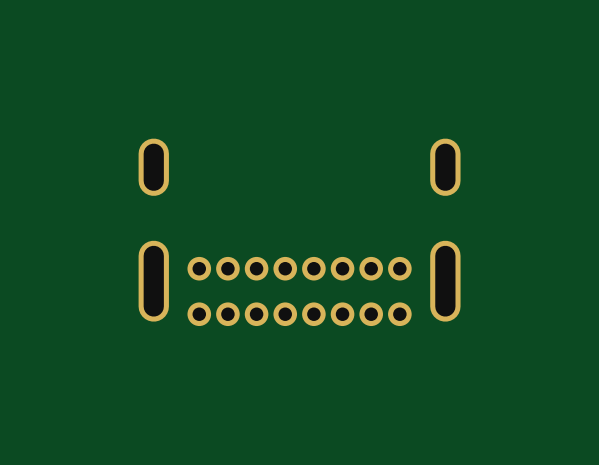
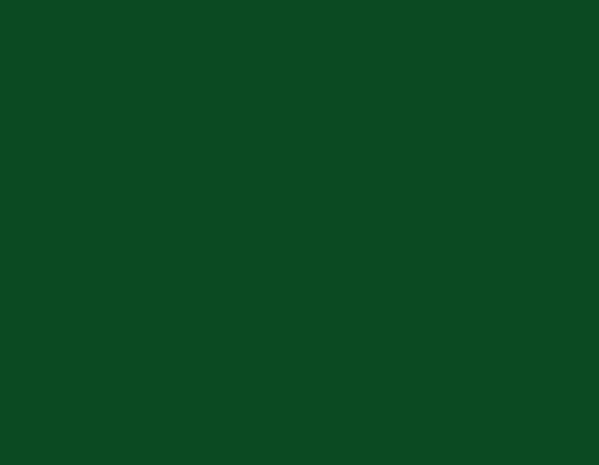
part: (299, 232) -> none

